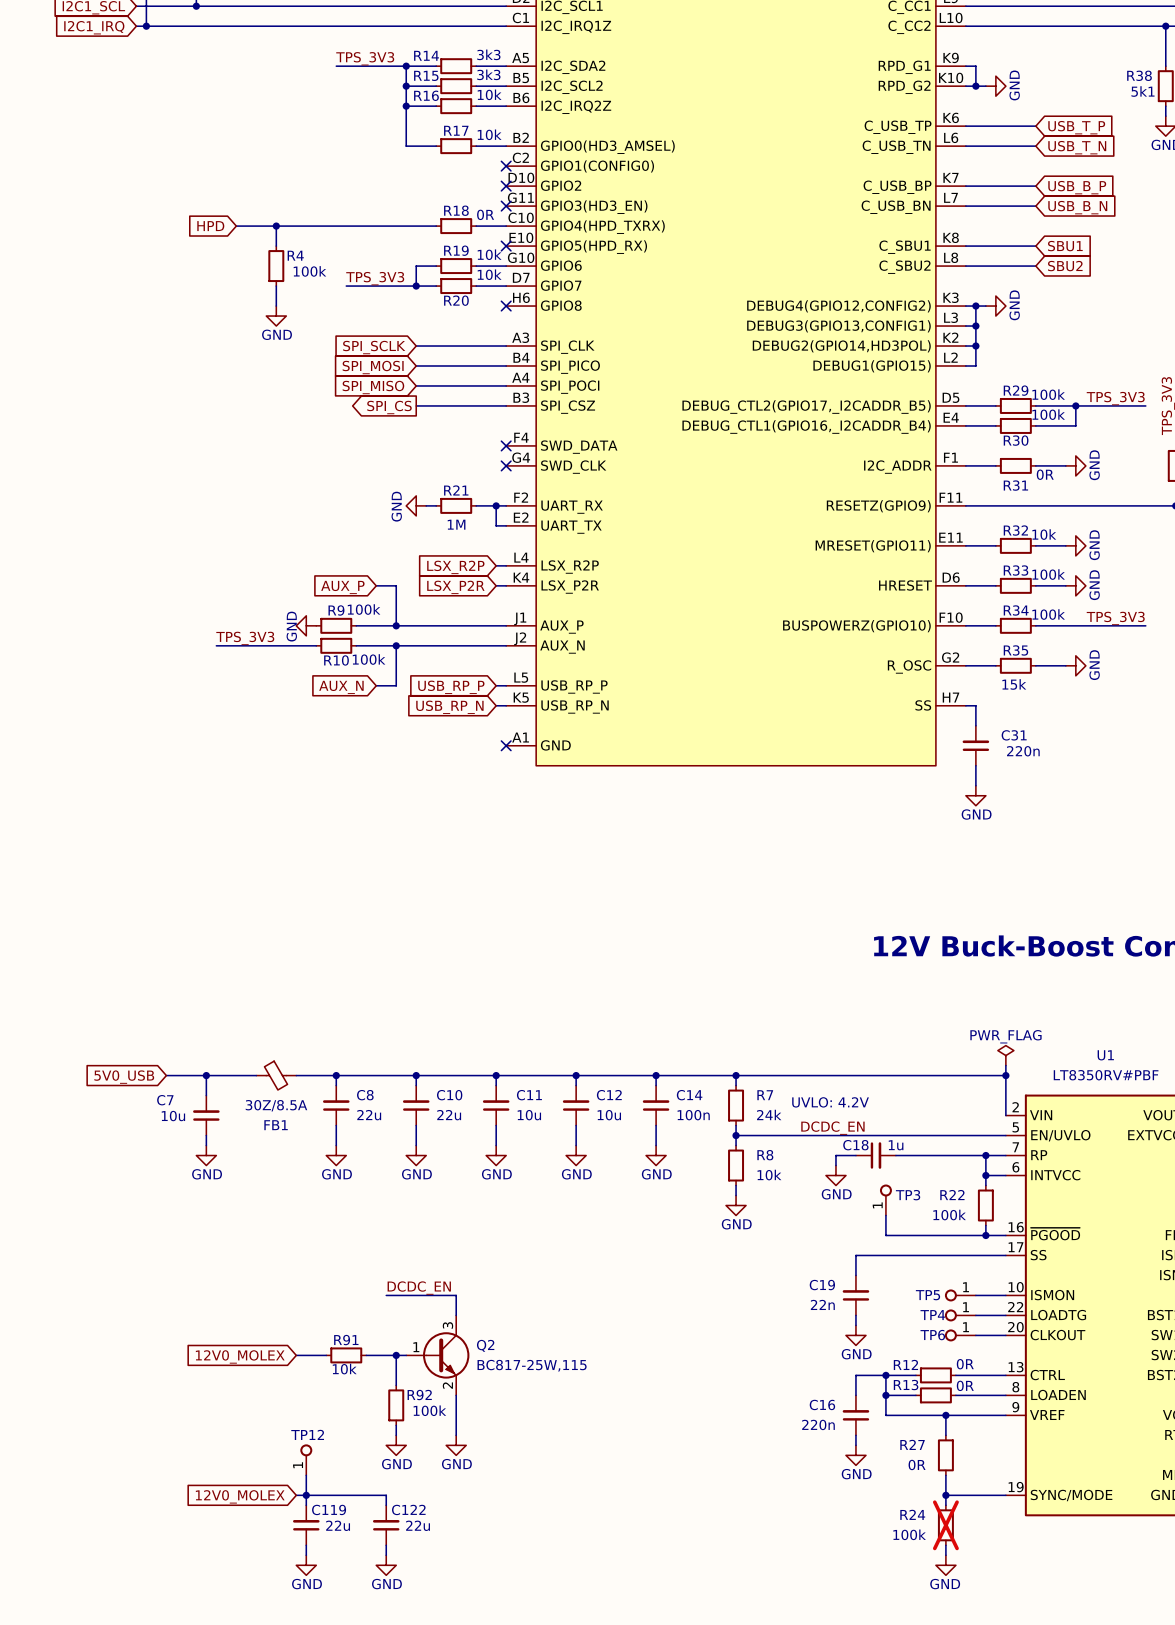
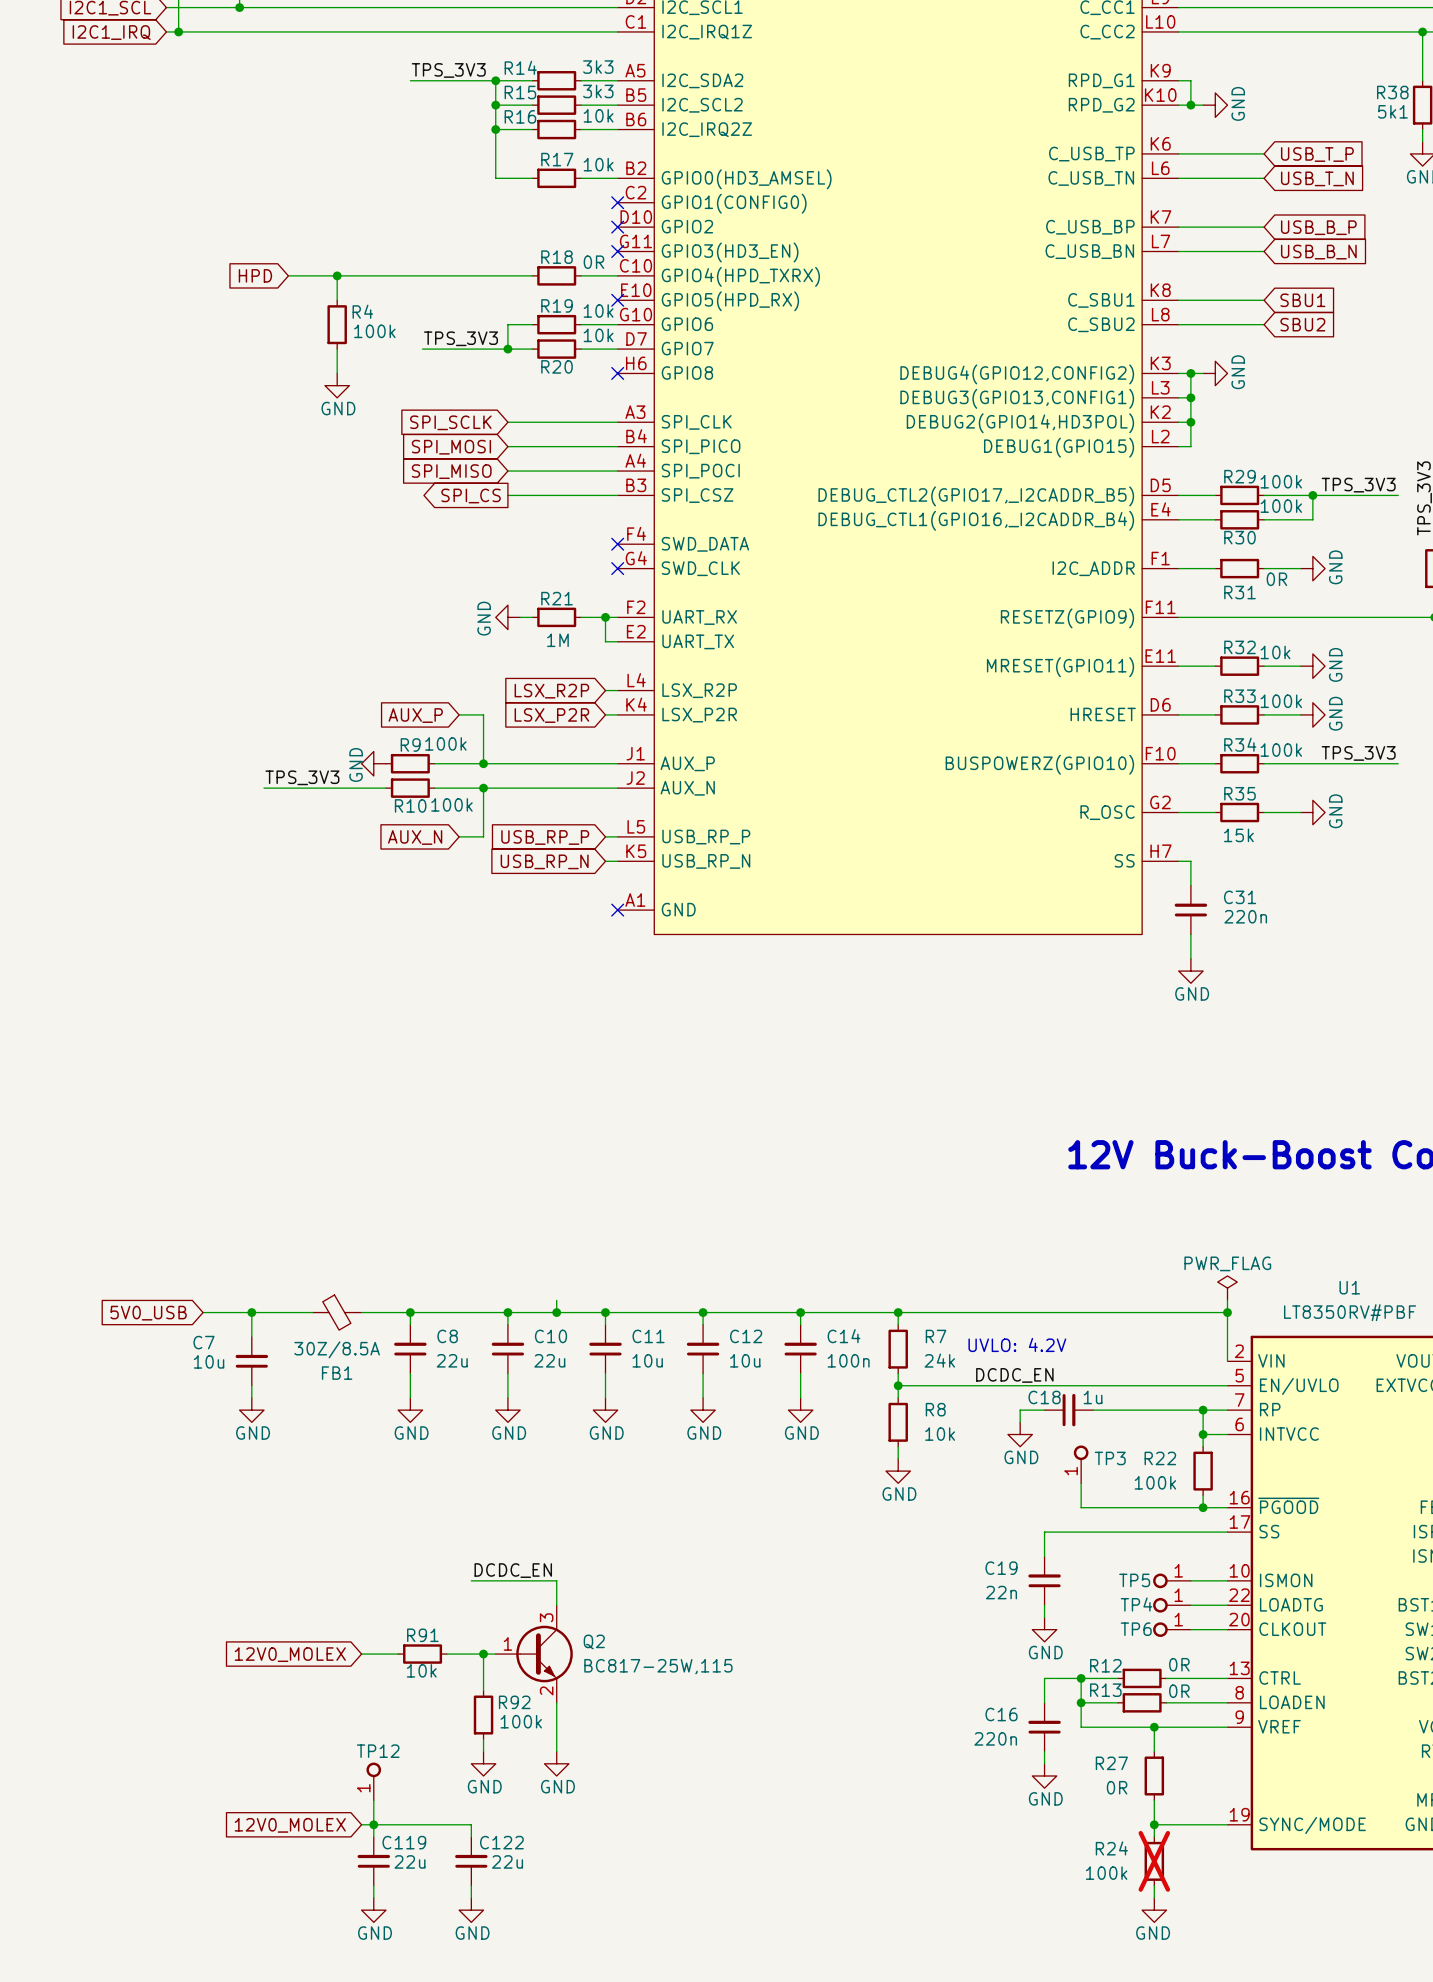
wire: none -> (556, 1300) (556, 1312)
junction: none -> (556, 1312)

